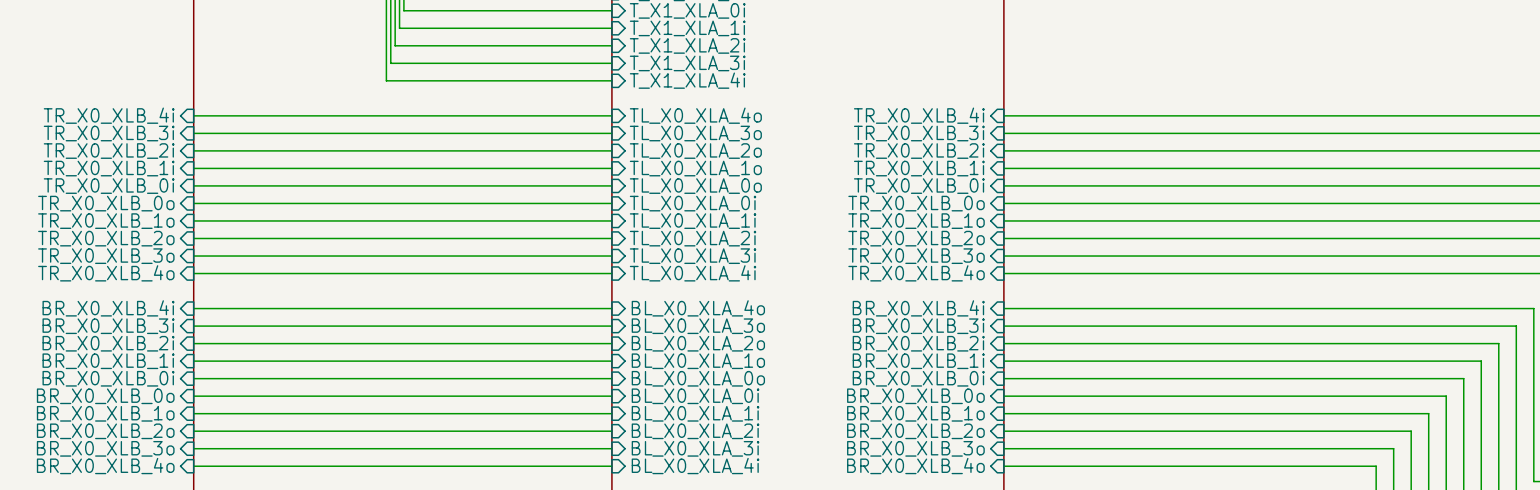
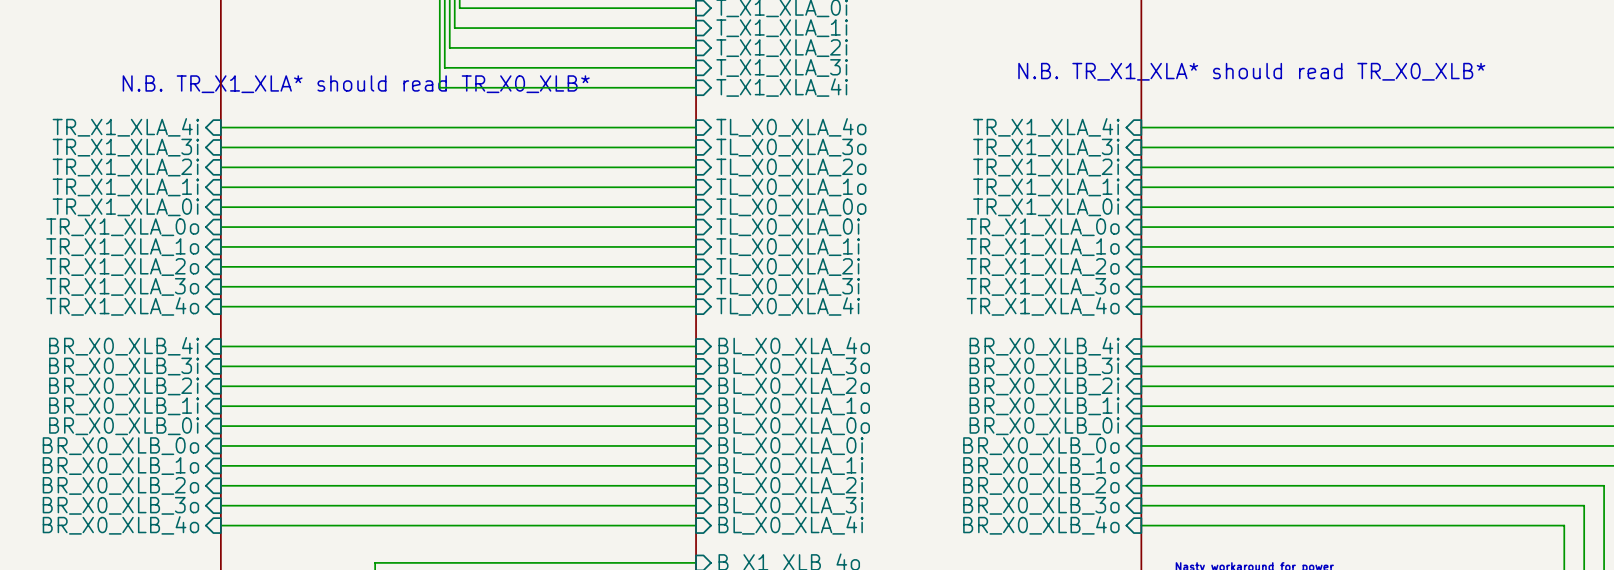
text: none -> N.B. TR_X1_XLA* should read TR_X0_XLB* (1251, 71)
text: none -> N.B. TR_X1_XLA* should read TR_X0_XLB* (356, 84)
sheet pin: TR_X0_XLB_4i (109, 115) -> TR_X1_XLA_4i (125, 127)
sheet pin: TR_X0_XLB_4i (919, 115) -> TR_X1_XLA_4i (1046, 127)
sheet pin: TR_X0_XLB_3i (109, 133) -> TR_X1_XLA_3i (125, 147)
sheet pin: TR_X0_XLB_3i (919, 133) -> TR_X1_XLA_3i (1046, 147)
sheet pin: TR_X0_XLB_2i (109, 151) -> TR_X1_XLA_2i (125, 167)
sheet pin: TR_X0_XLB_2i (919, 151) -> TR_X1_XLA_2i (1046, 167)
sheet pin: TR_X0_XLB_1i (109, 168) -> TR_X1_XLA_1i (125, 187)
sheet pin: TR_X0_XLB_1i (919, 168) -> TR_X1_XLA_1i (1046, 187)
sheet pin: TR_X0_XLB_0i (109, 186) -> TR_X1_XLA_0i (125, 207)
sheet pin: TR_X0_XLB_0i (919, 186) -> TR_X1_XLA_0i (1046, 207)
sheet pin: TR_X0_XLB_0o (106, 203) -> TR_X1_XLA_0o (122, 227)
sheet pin: TR_X0_XLB_0o (916, 203) -> TR_X1_XLA_0o (1043, 227)
sheet pin: TR_X0_XLB_1o (106, 221) -> TR_X1_XLA_1o (122, 247)
sheet pin: TR_X0_XLB_1o (916, 221) -> TR_X1_XLA_1o (1043, 247)
sheet pin: TR_X0_XLB_2o (106, 238) -> TR_X1_XLA_2o (122, 267)
sheet pin: TR_X0_XLB_2o (916, 238) -> TR_X1_XLA_2o (1043, 267)
sheet pin: TR_X0_XLB_3o (106, 256) -> TR_X1_XLA_3o (122, 286)
sheet pin: TR_X0_XLB_3o (916, 256) -> TR_X1_XLA_3o (1043, 286)
sheet pin: TR_X0_XLB_4o (106, 273) -> TR_X1_XLA_4o (122, 306)
sheet pin: TR_X0_XLB_4o (916, 273) -> TR_X1_XLA_4o (1043, 306)

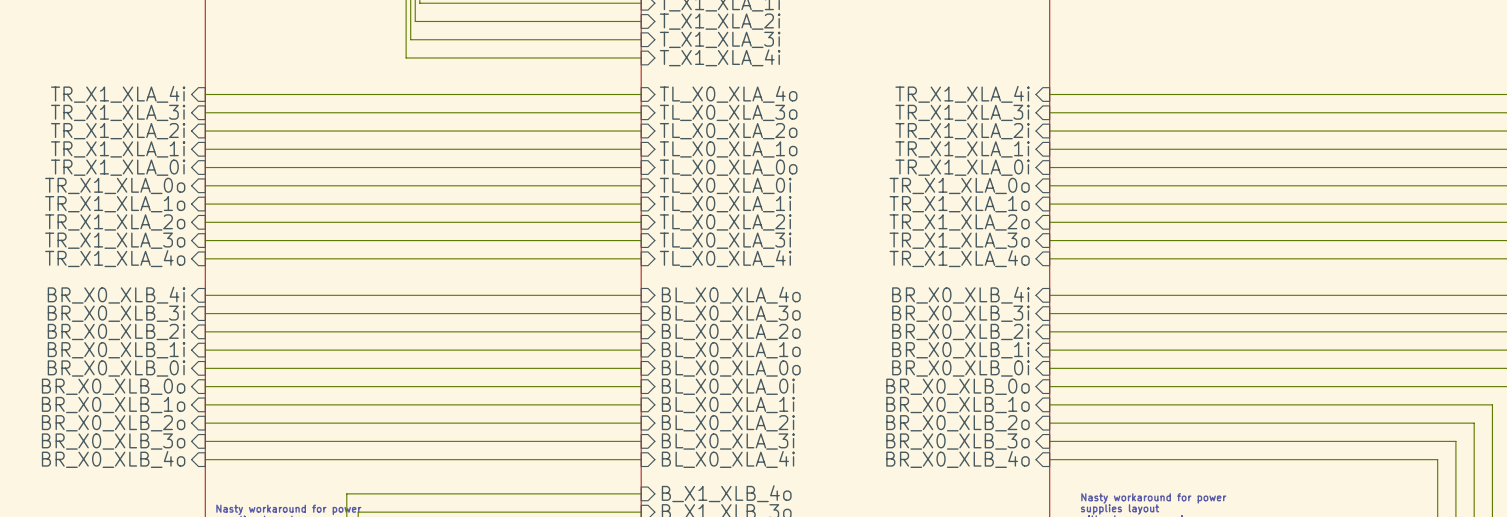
text: N.B. TR_X1_XLA* should read TR_X0_XLB* (1251, 71) -> none
text: N.B. TR_X1_XLA* should read TR_X0_XLB* (356, 84) -> none

